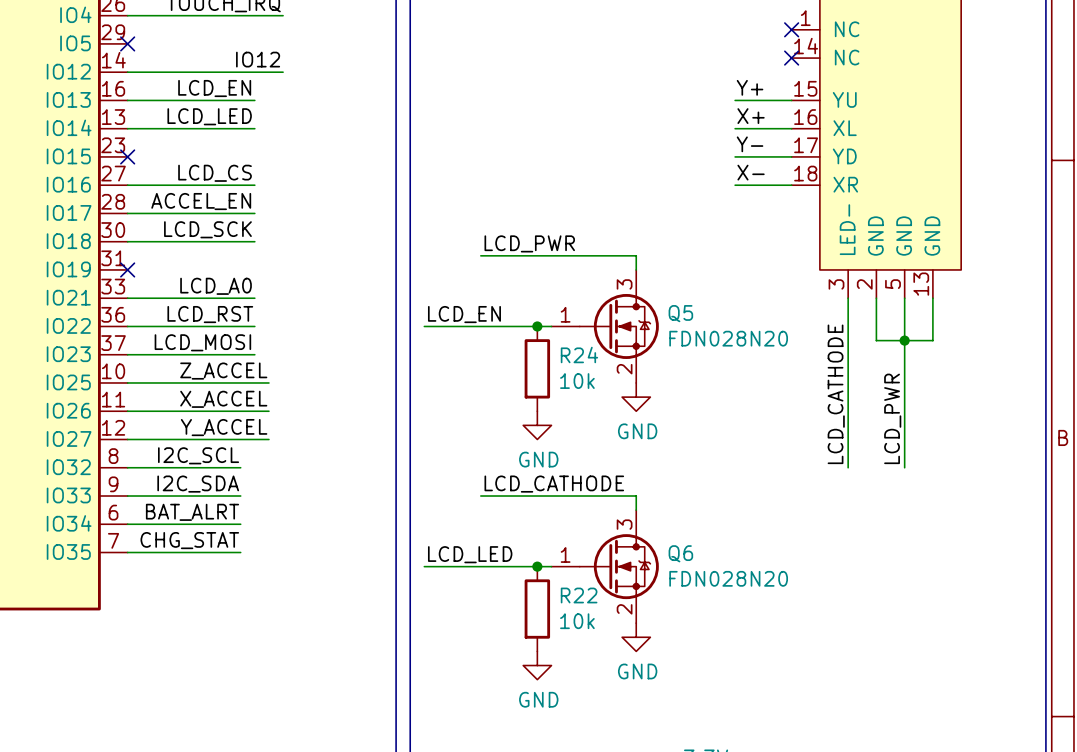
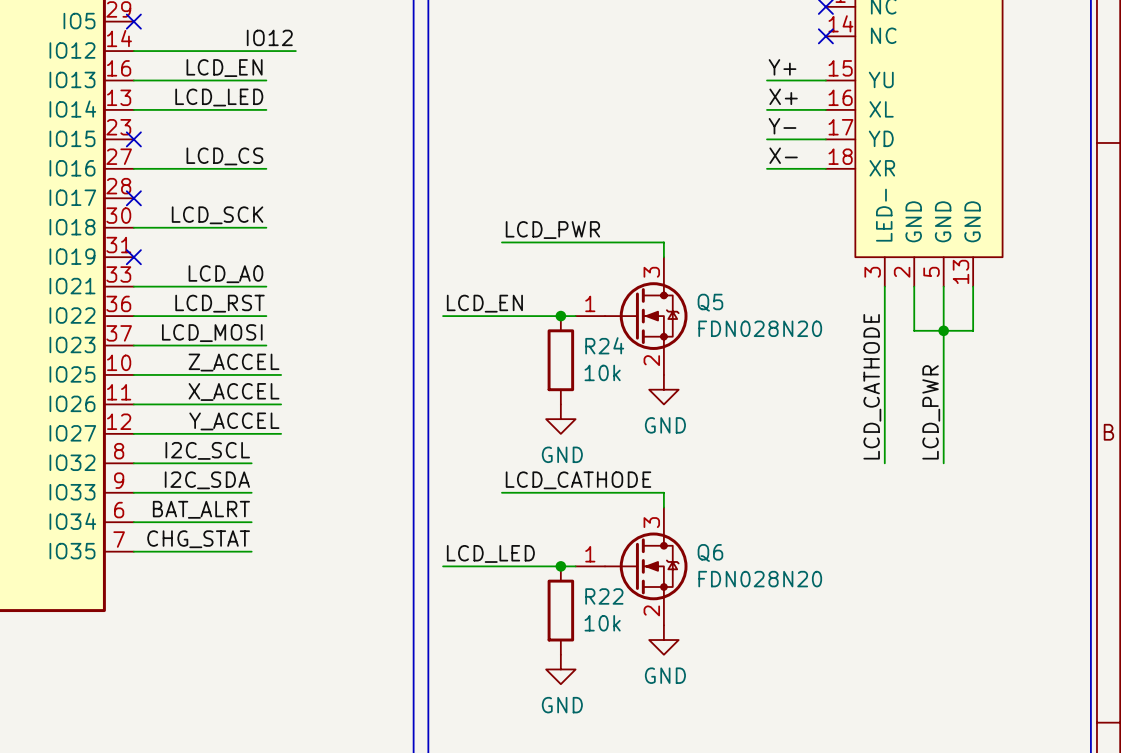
label: ACCEL_EN (201, 201) -> none
wire: (127, 213) (254, 213) -> none
no-connect mark: none -> (133, 198)

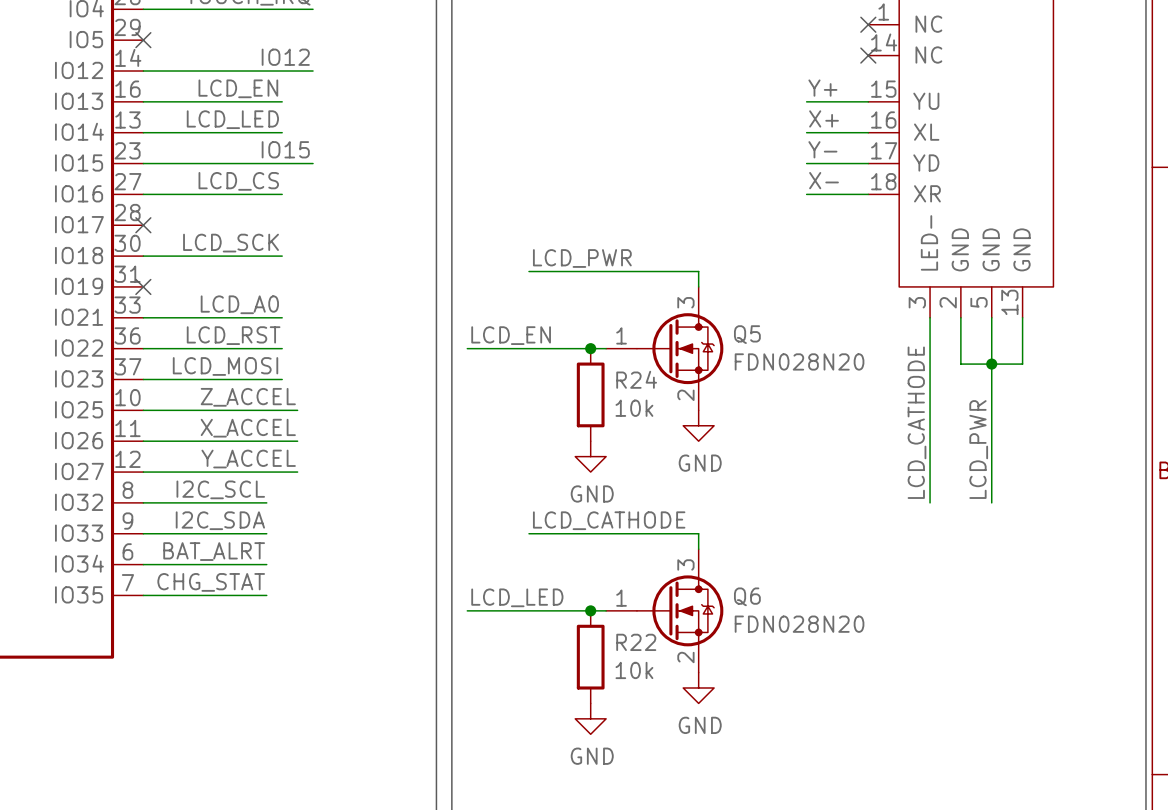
label: none -> IO15 (285, 149)
wire: none -> (143, 163) (313, 163)
no-connect mark: (133, 139) -> none

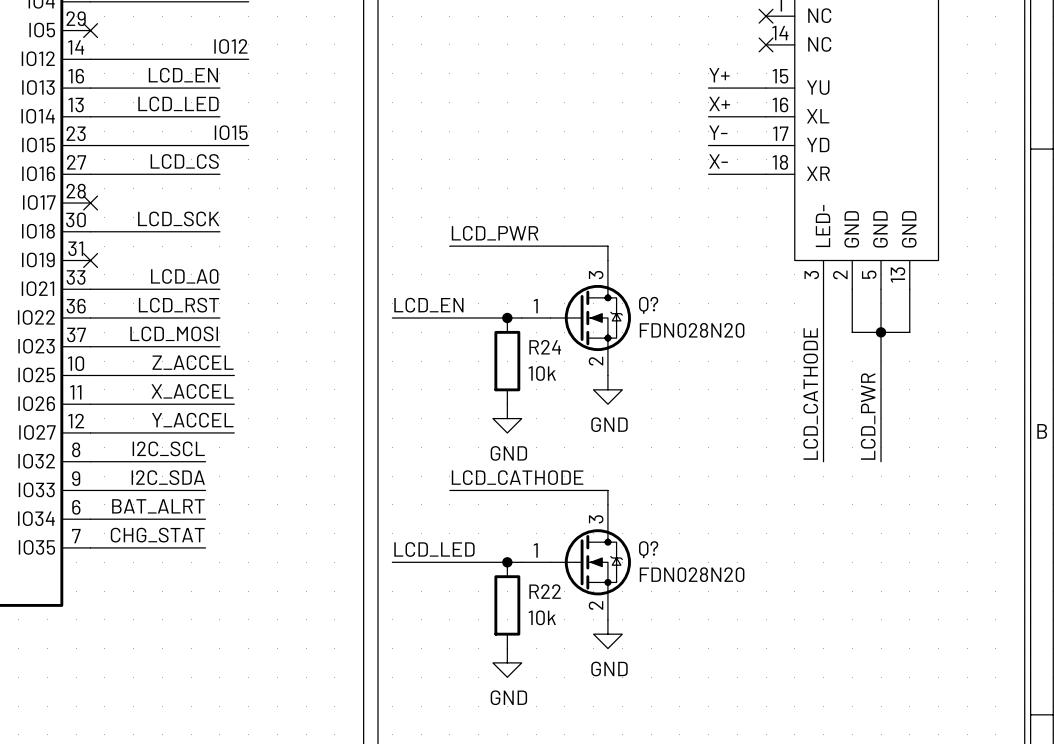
Q5 name: Q5 (747, 334) -> Q? (648, 305)
Q6 name: Q6 (747, 596) -> Q? (648, 549)

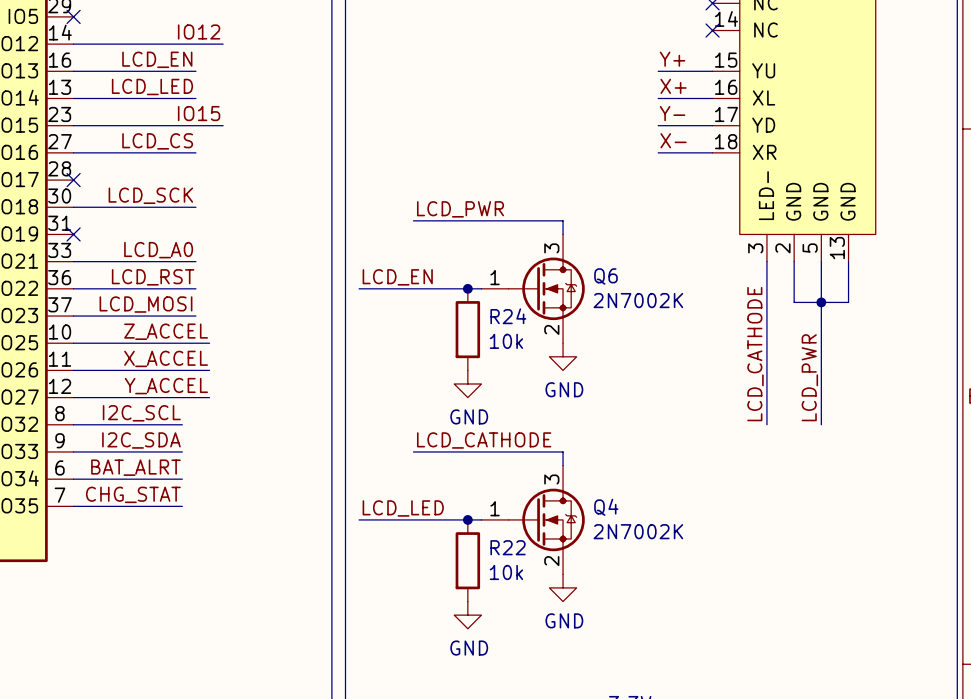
Q? name: Q? (648, 305) -> Q6 (605, 276)
Q? value: FDN028N20 (692, 330) -> 2N7002K (638, 300)
Q? name: Q? (648, 549) -> Q4 (606, 507)
Q? value: FDN028N20 (692, 574) -> 2N7002K (638, 531)

